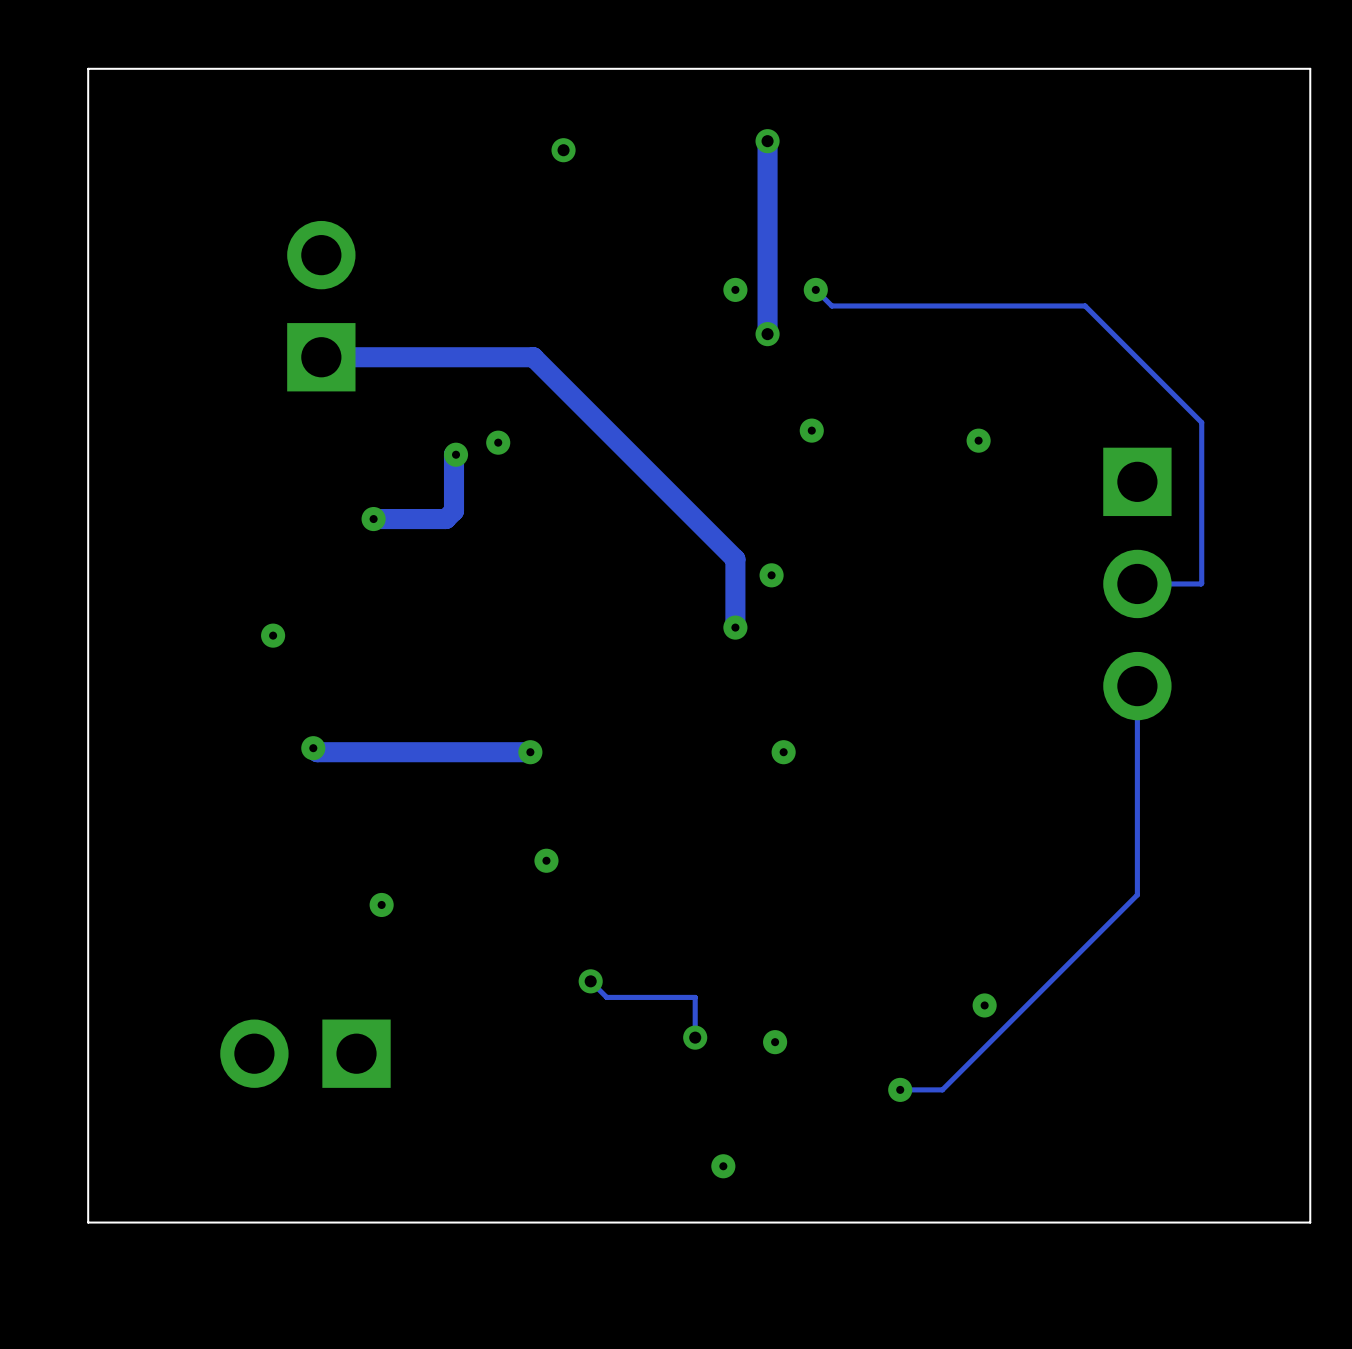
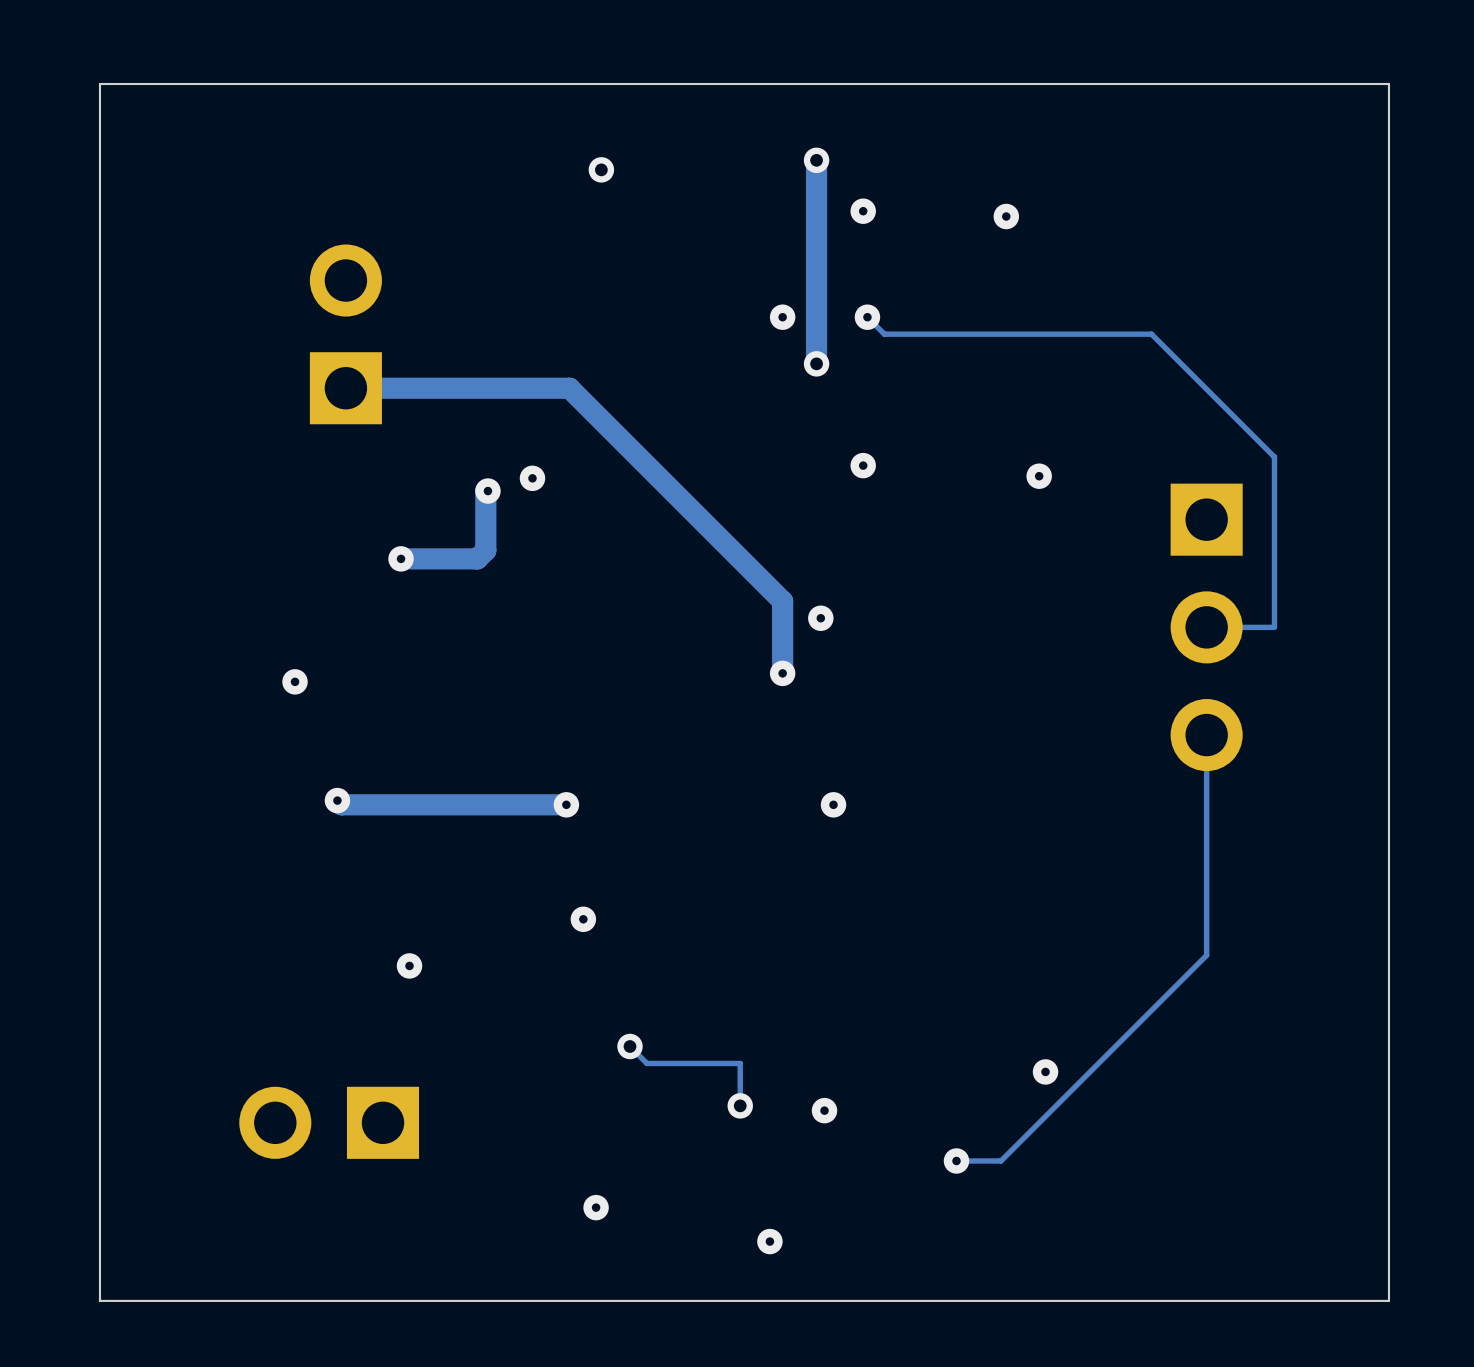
via: none -> (863, 211)
via: none -> (1006, 216)
via: none -> (596, 1207)

